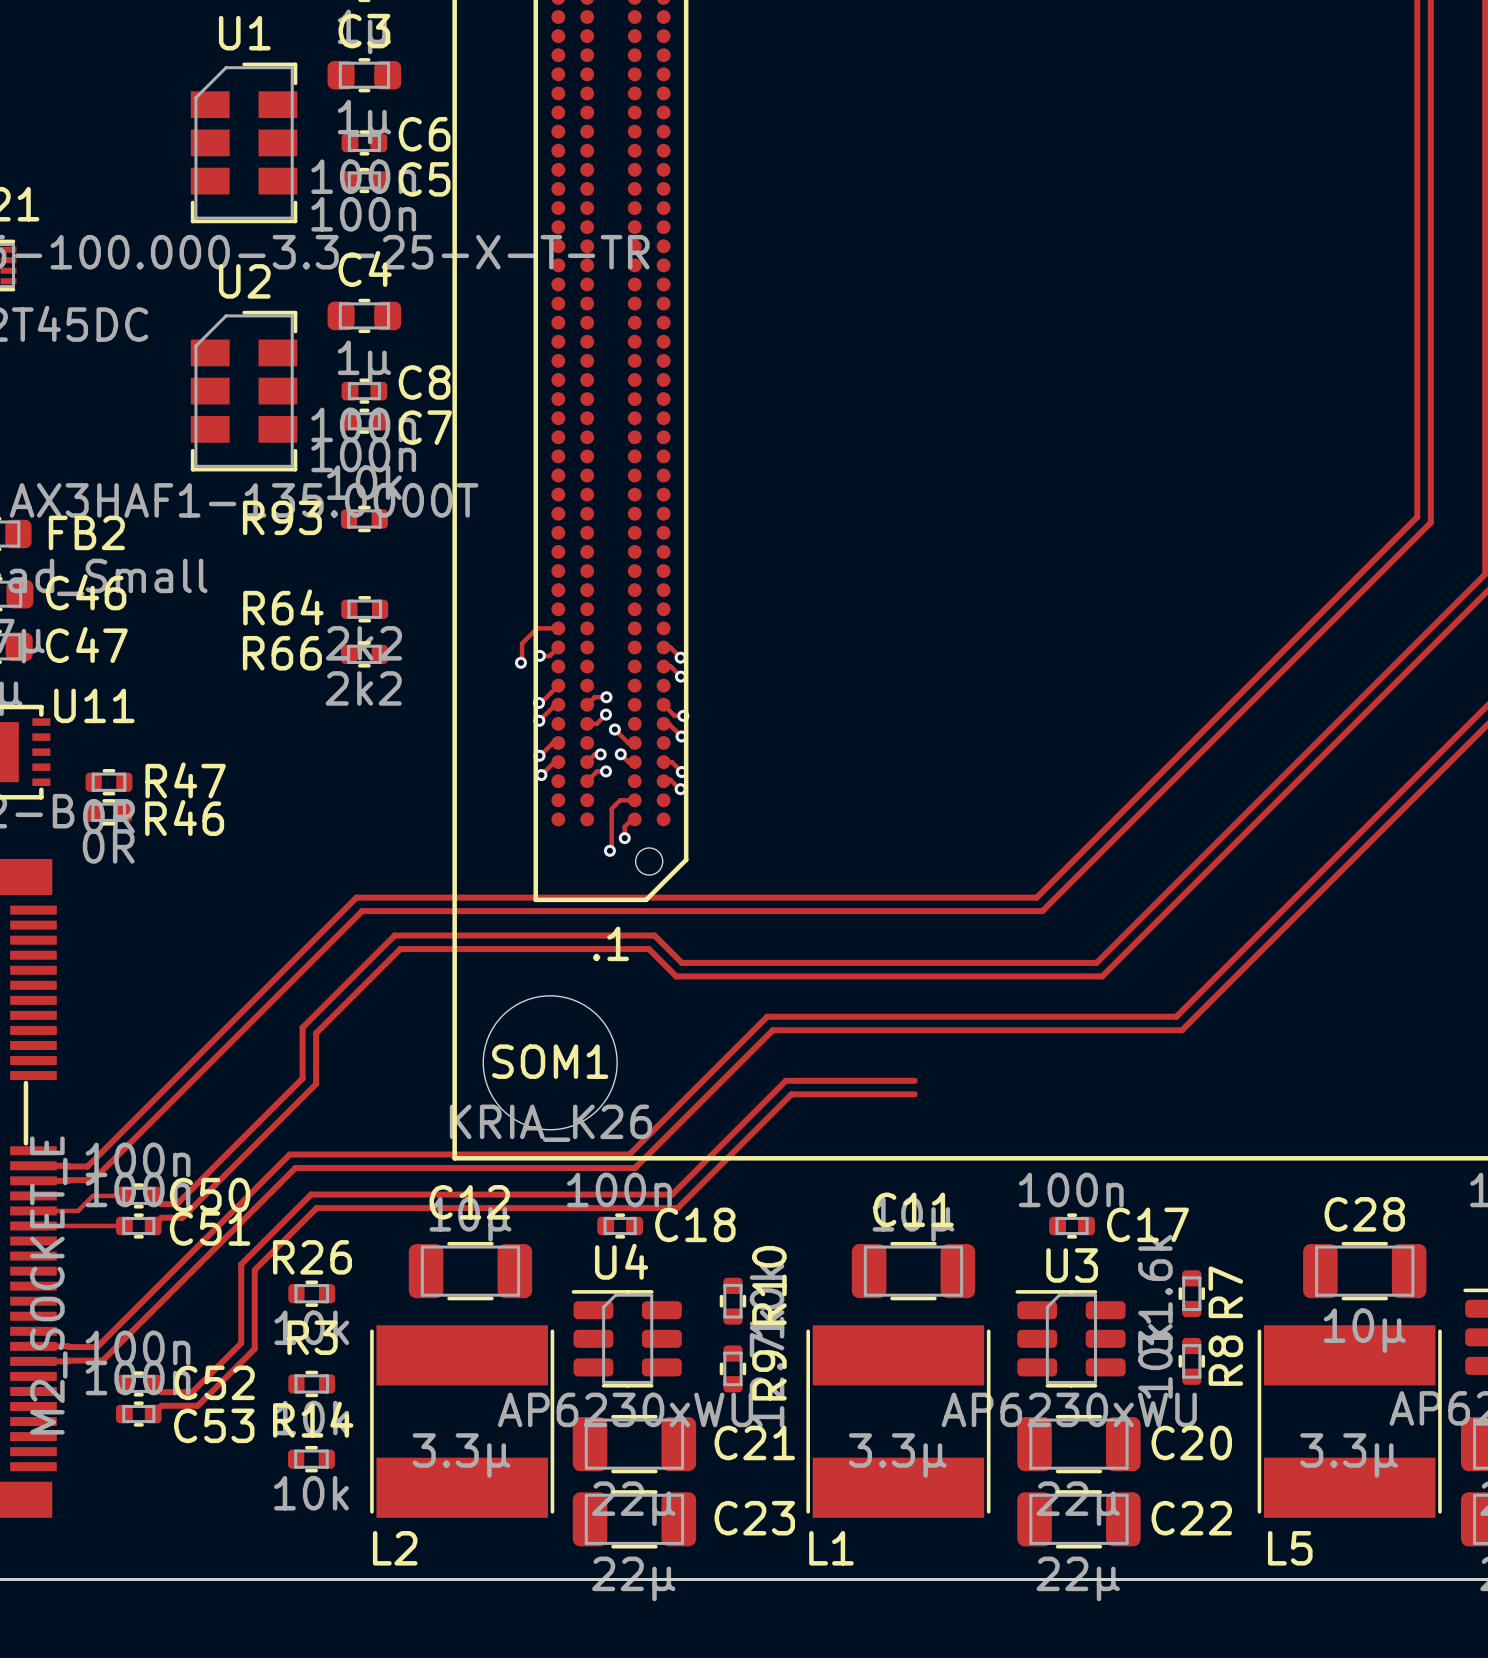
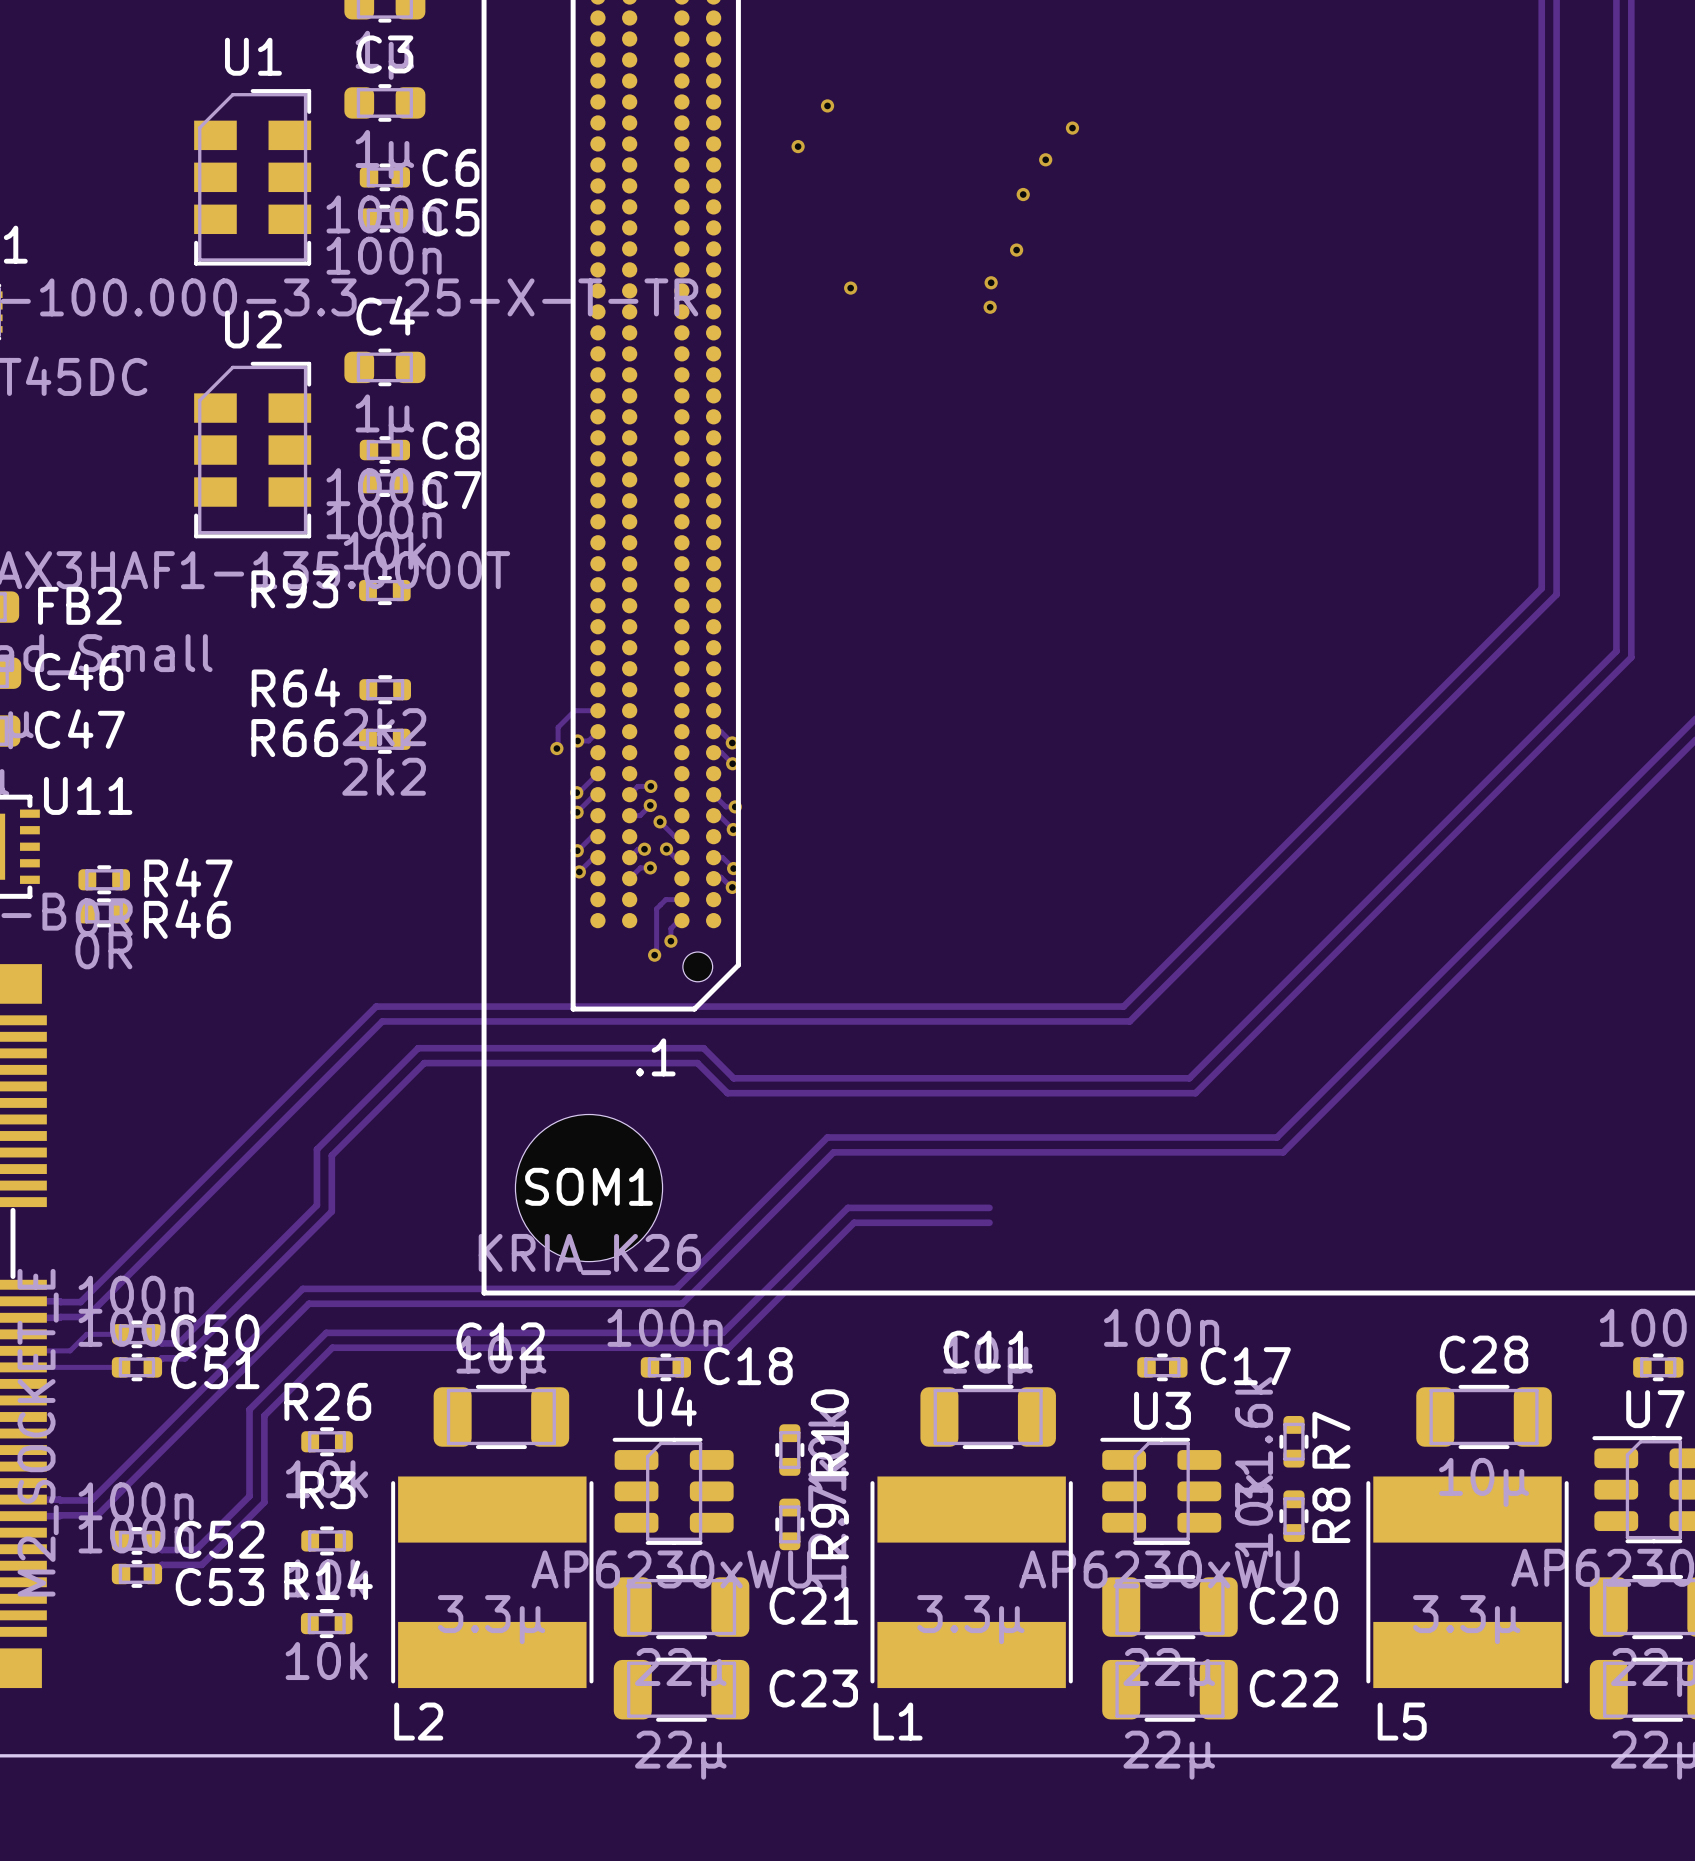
via: none -> (827, 105)
via: none -> (1072, 128)
via: none -> (798, 146)
via: none -> (1045, 159)
via: none -> (1023, 194)
via: none -> (1016, 250)
via: none -> (991, 282)
via: none -> (850, 288)
via: none -> (990, 307)

